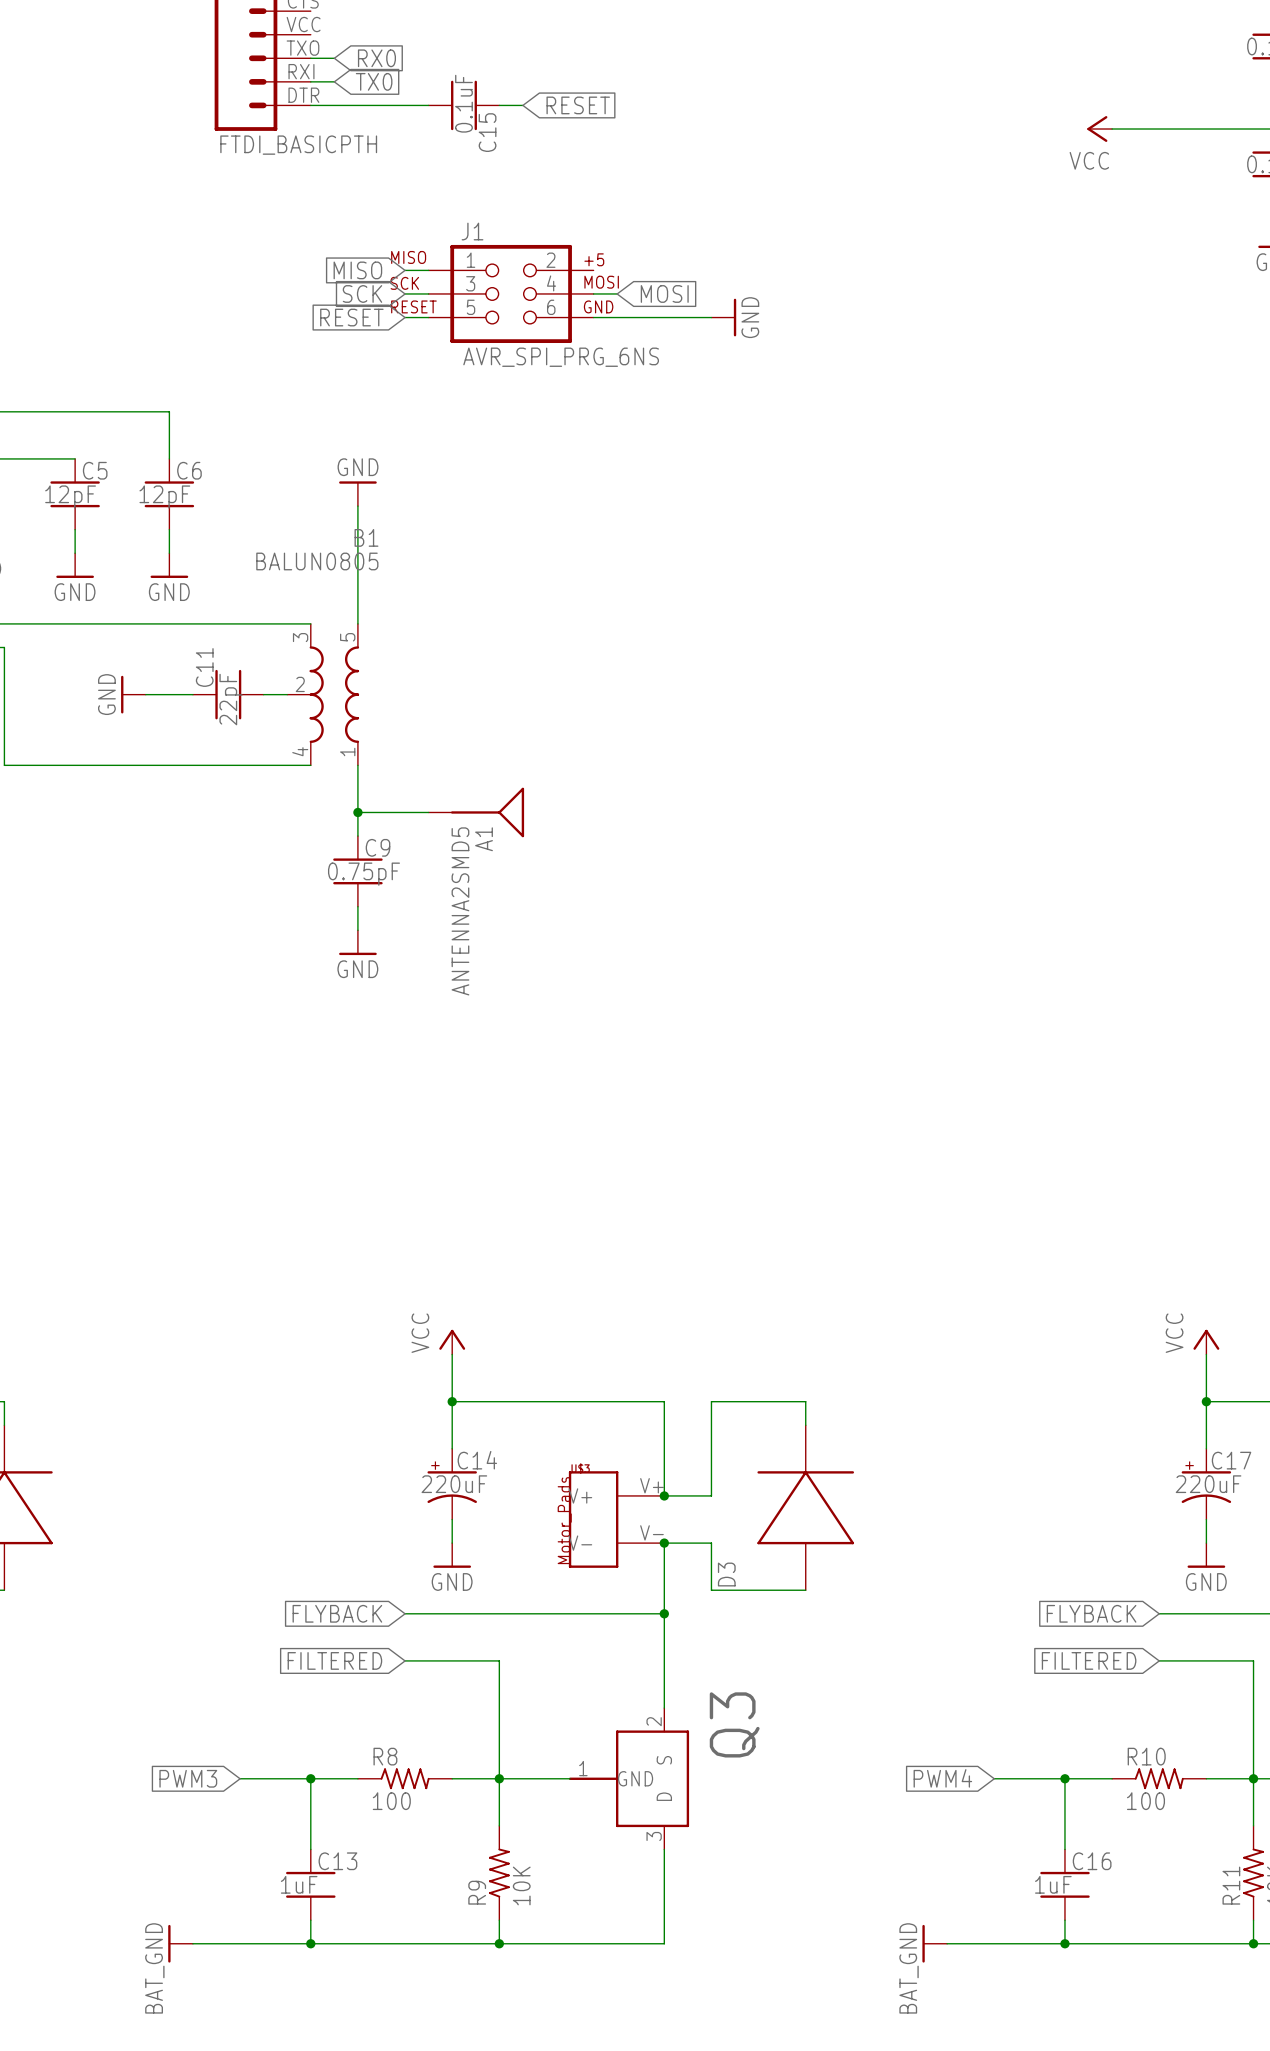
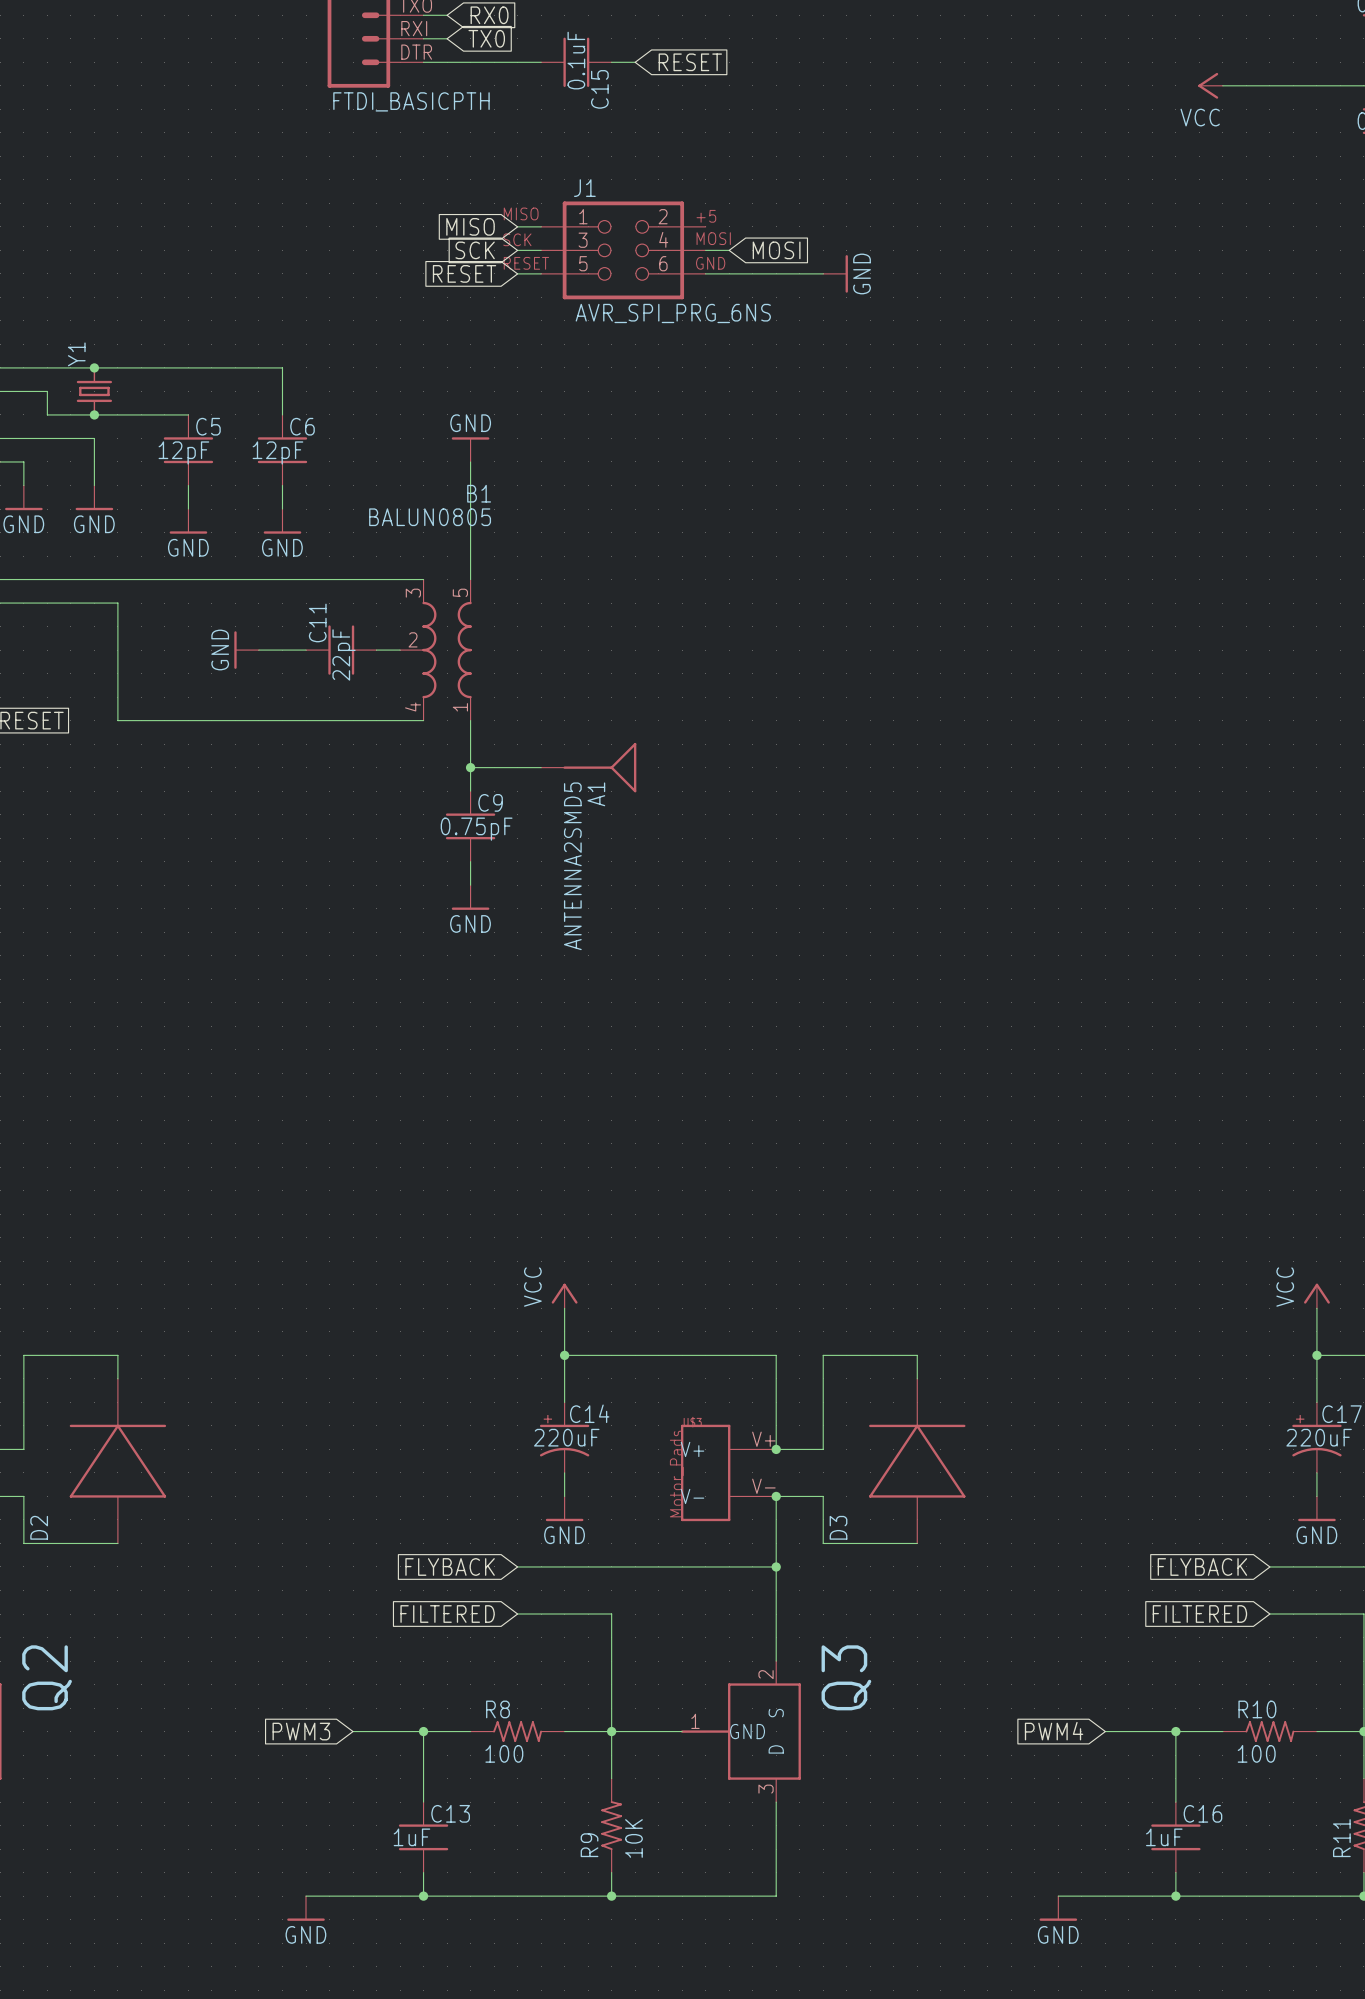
power symbol: BAT_GND (180, 1943) -> none
power symbol: BAT_GND (934, 1943) -> none
power symbol: none -> GND (306, 1908)
power symbol: none -> GND (1058, 1908)

